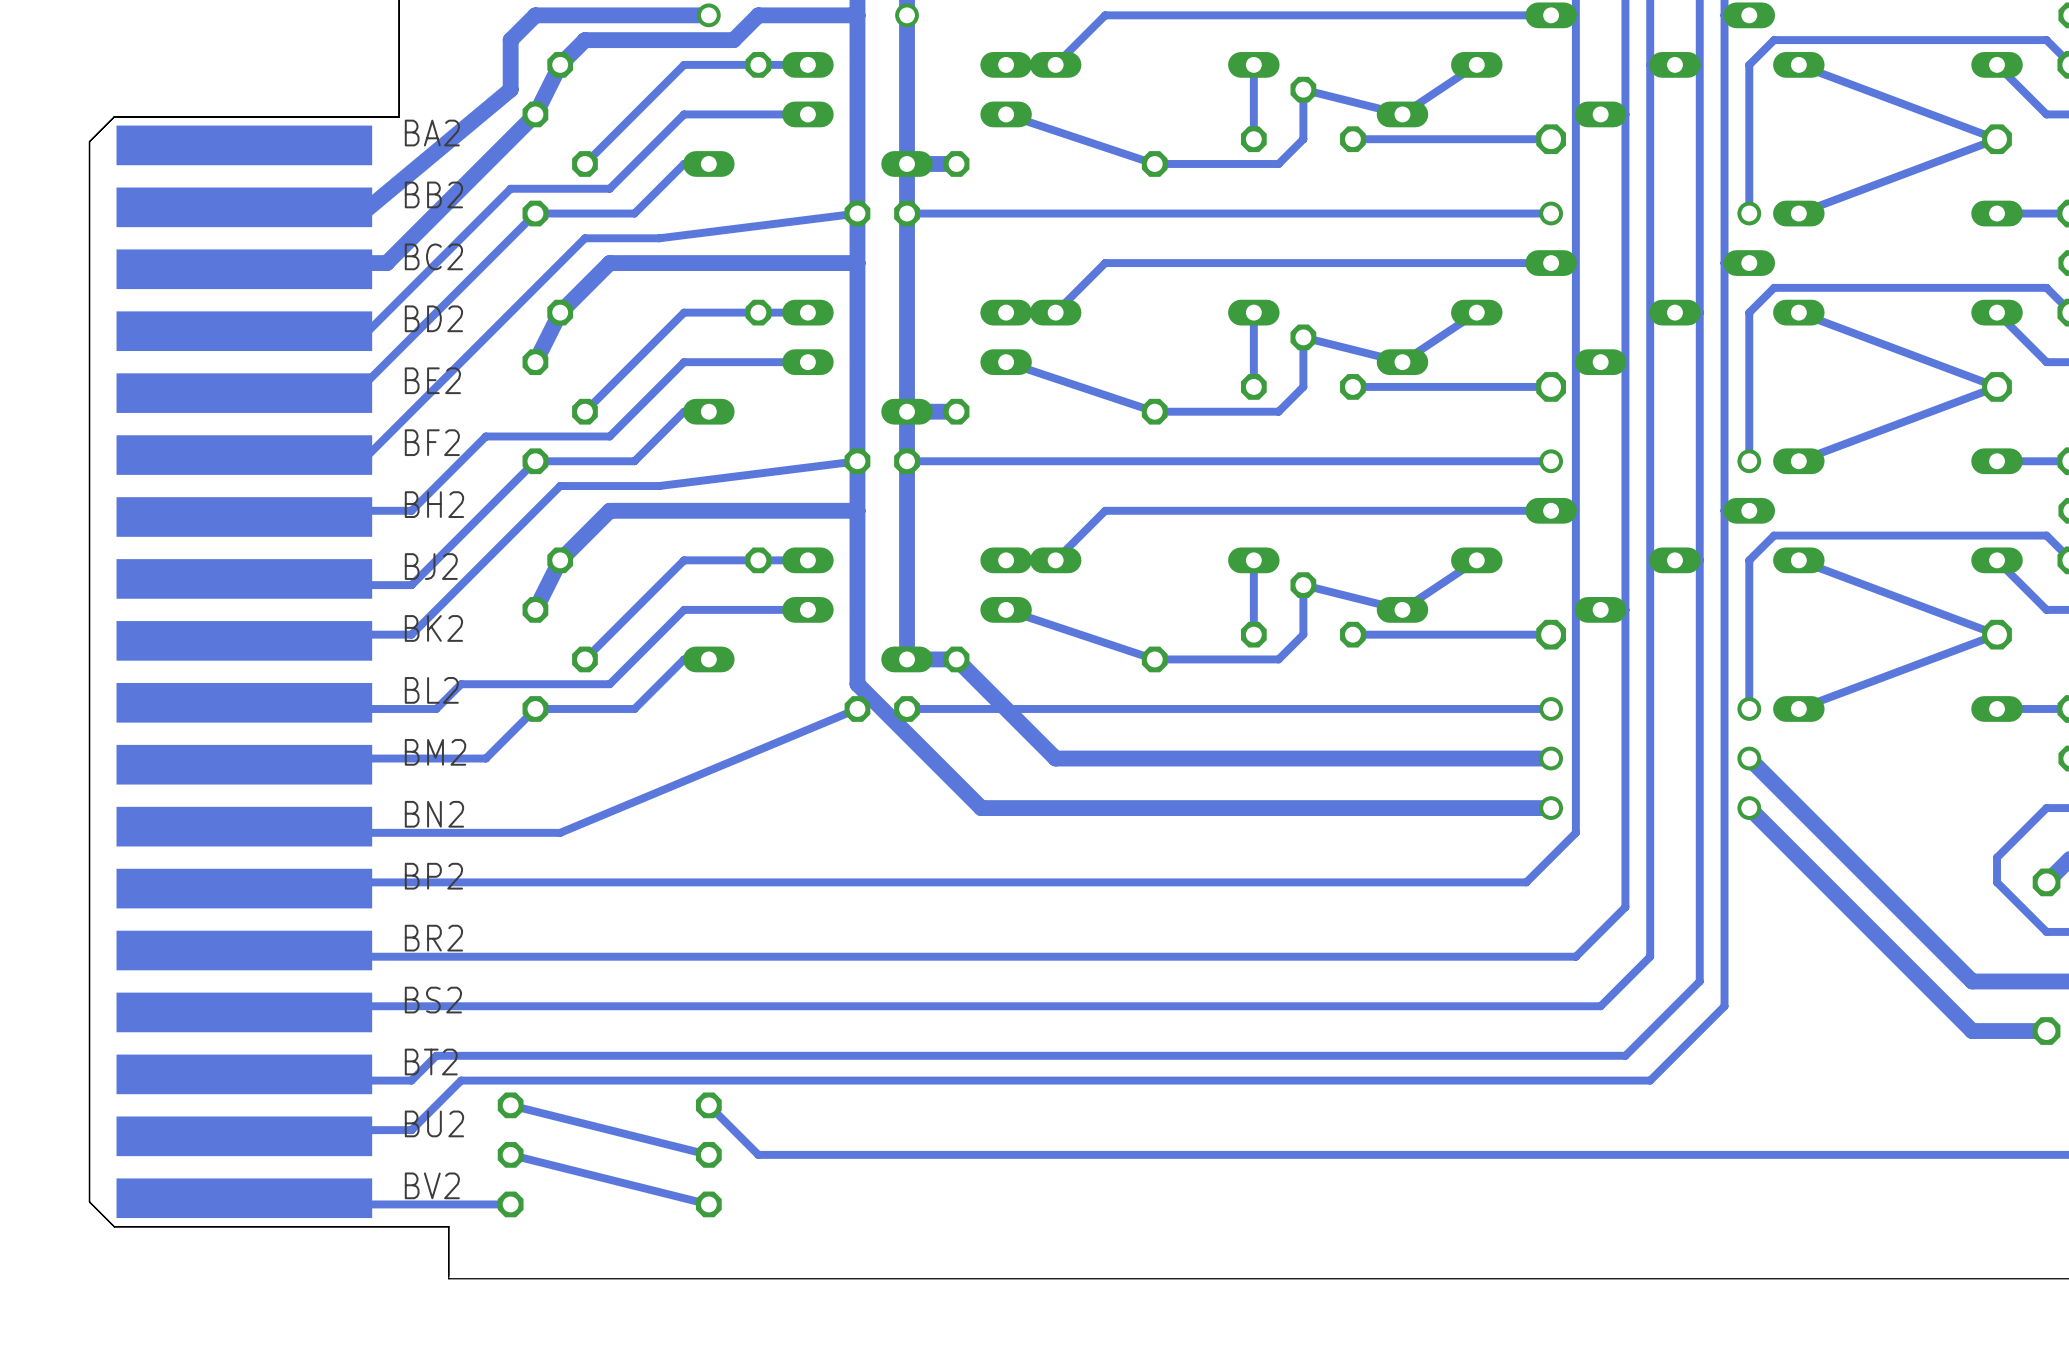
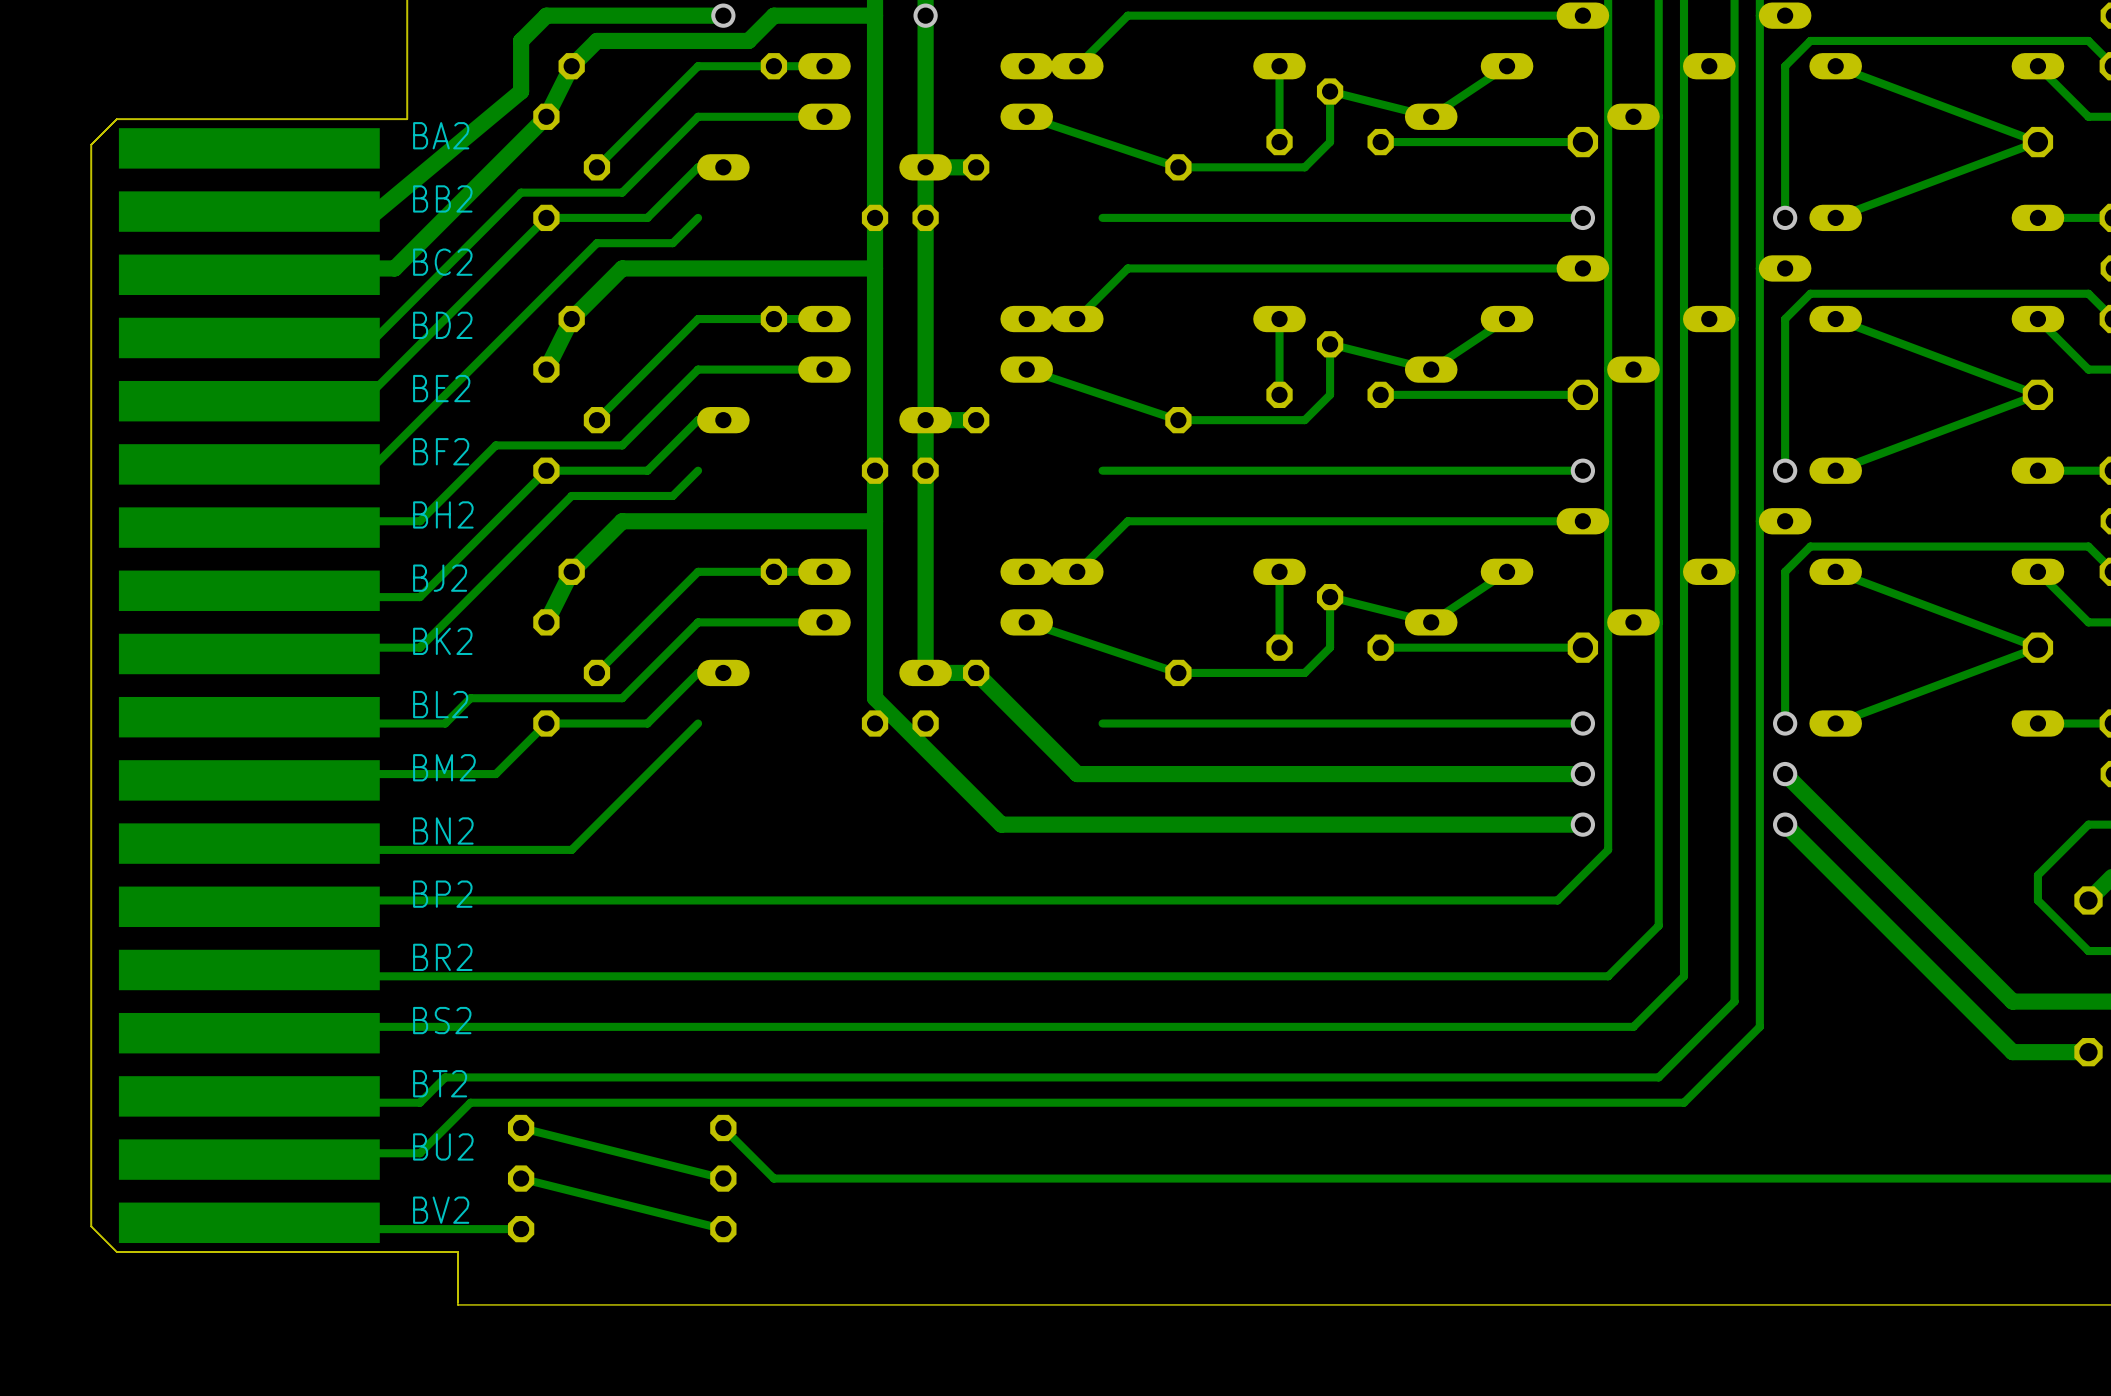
track: (857, 213) (659, 238) -> (698, 217) (672, 243)
track: (1080, 213) (907, 213) -> none
track: (857, 461) (659, 486) -> (698, 470) (672, 495)
track: (1080, 461) (907, 461) -> none
track: (857, 708) (560, 832) -> (698, 723) (571, 849)
track: (1080, 708) (907, 708) -> none

